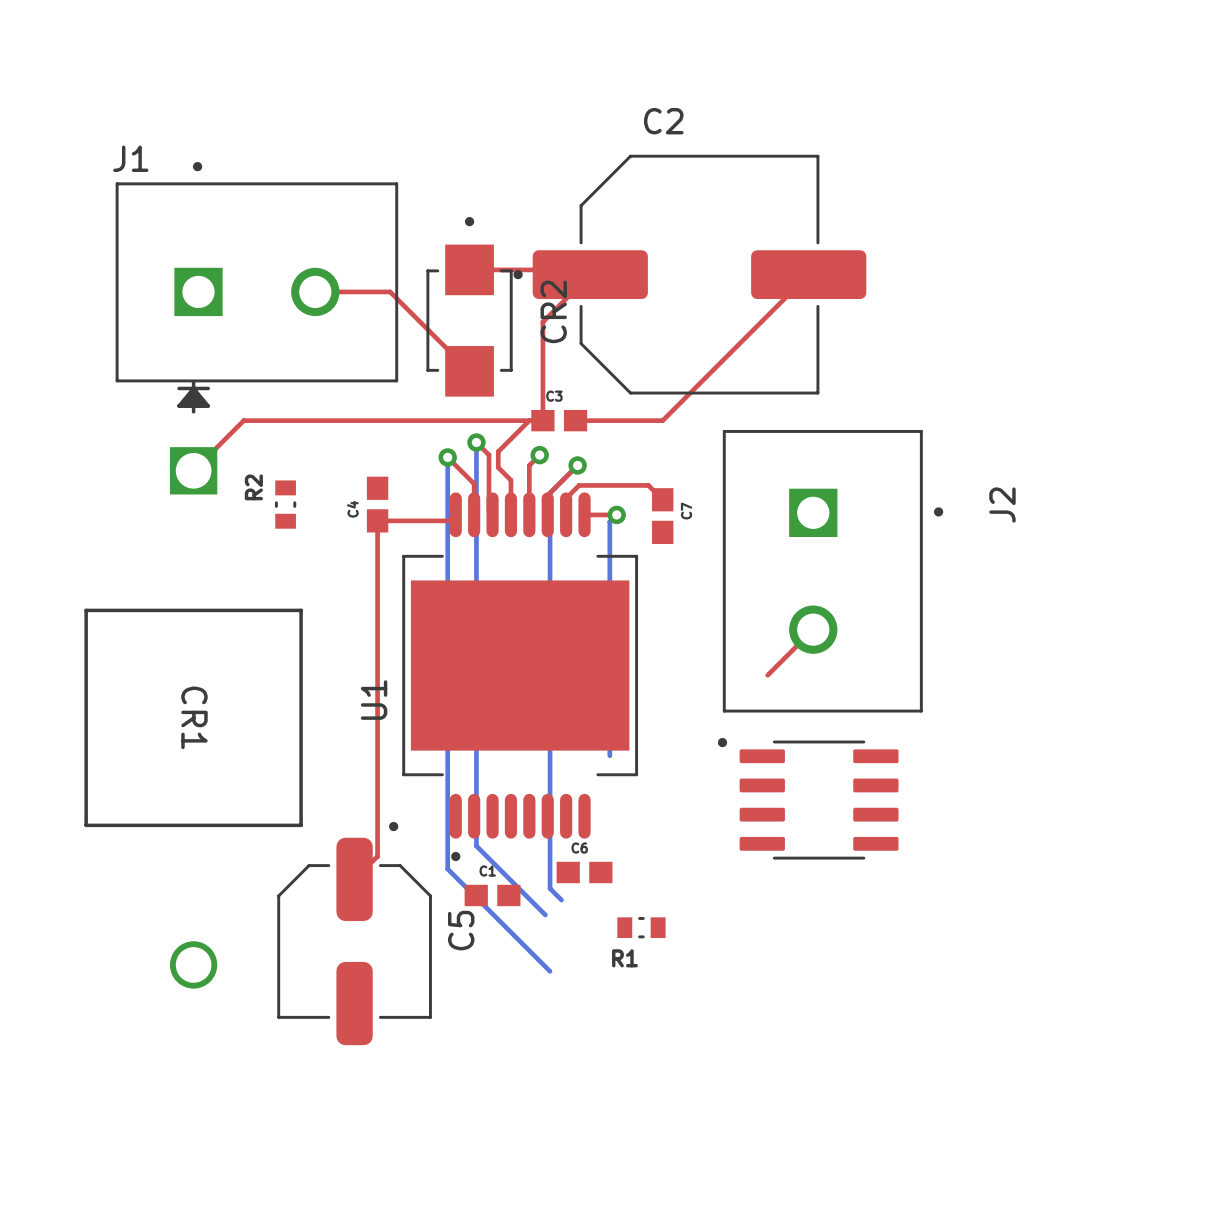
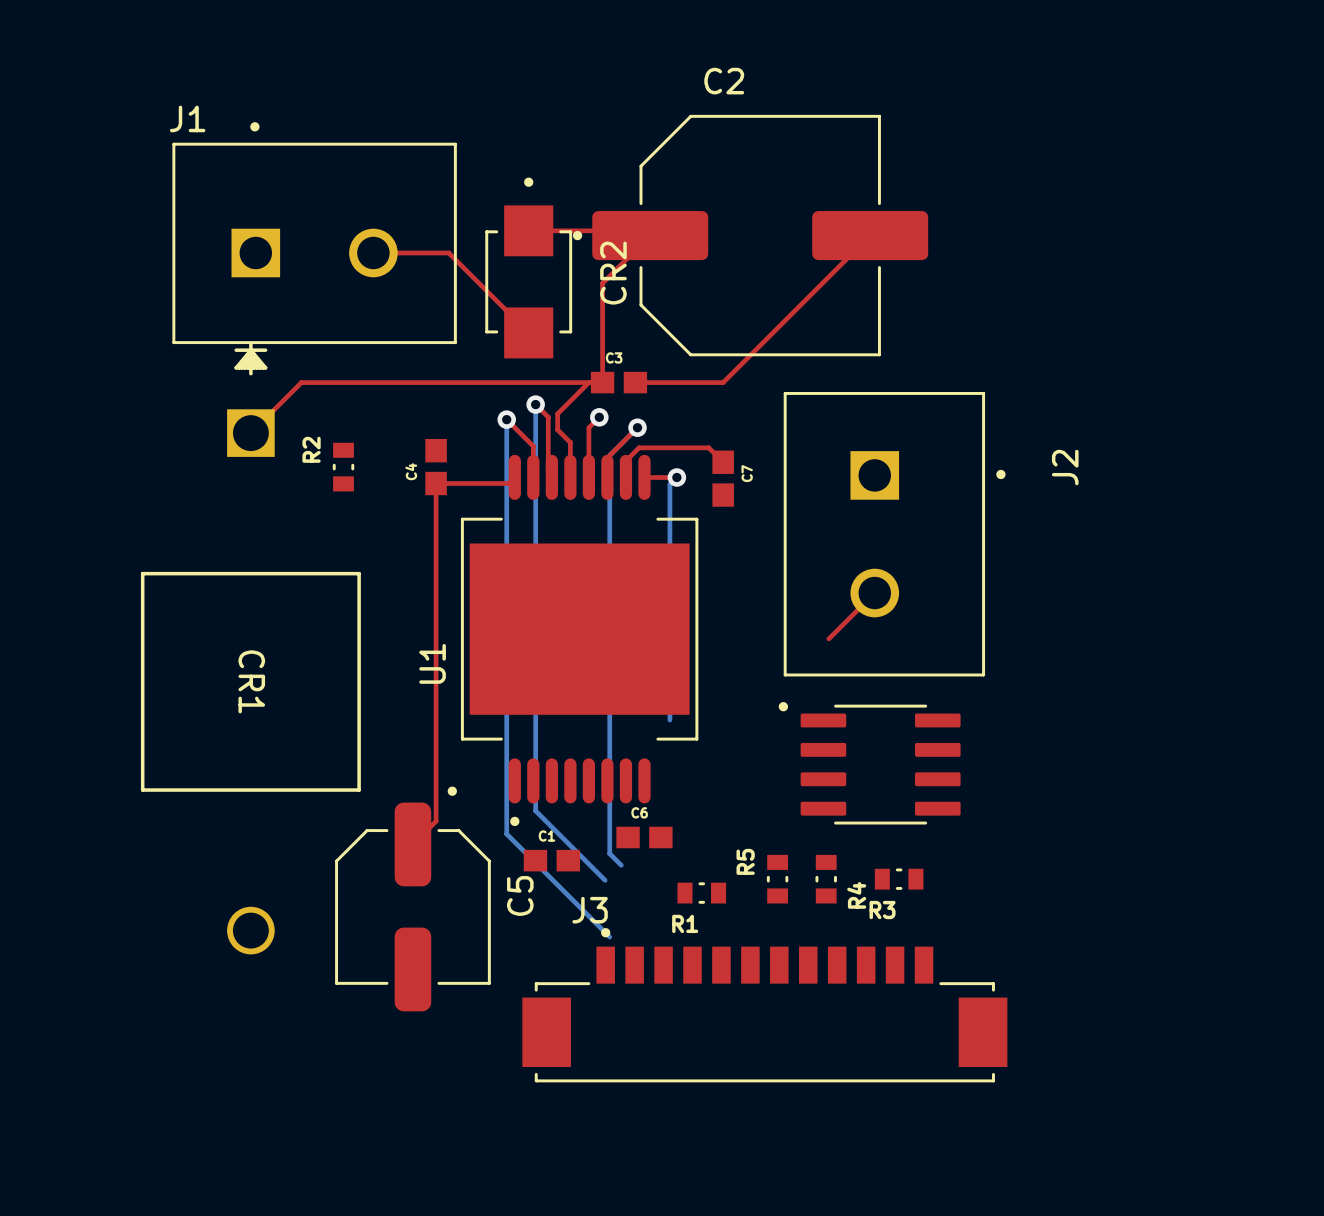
R5: none -> (777, 879)
R4: none -> (826, 879)
R3: none -> (899, 879)
J3: none -> (764, 1005)

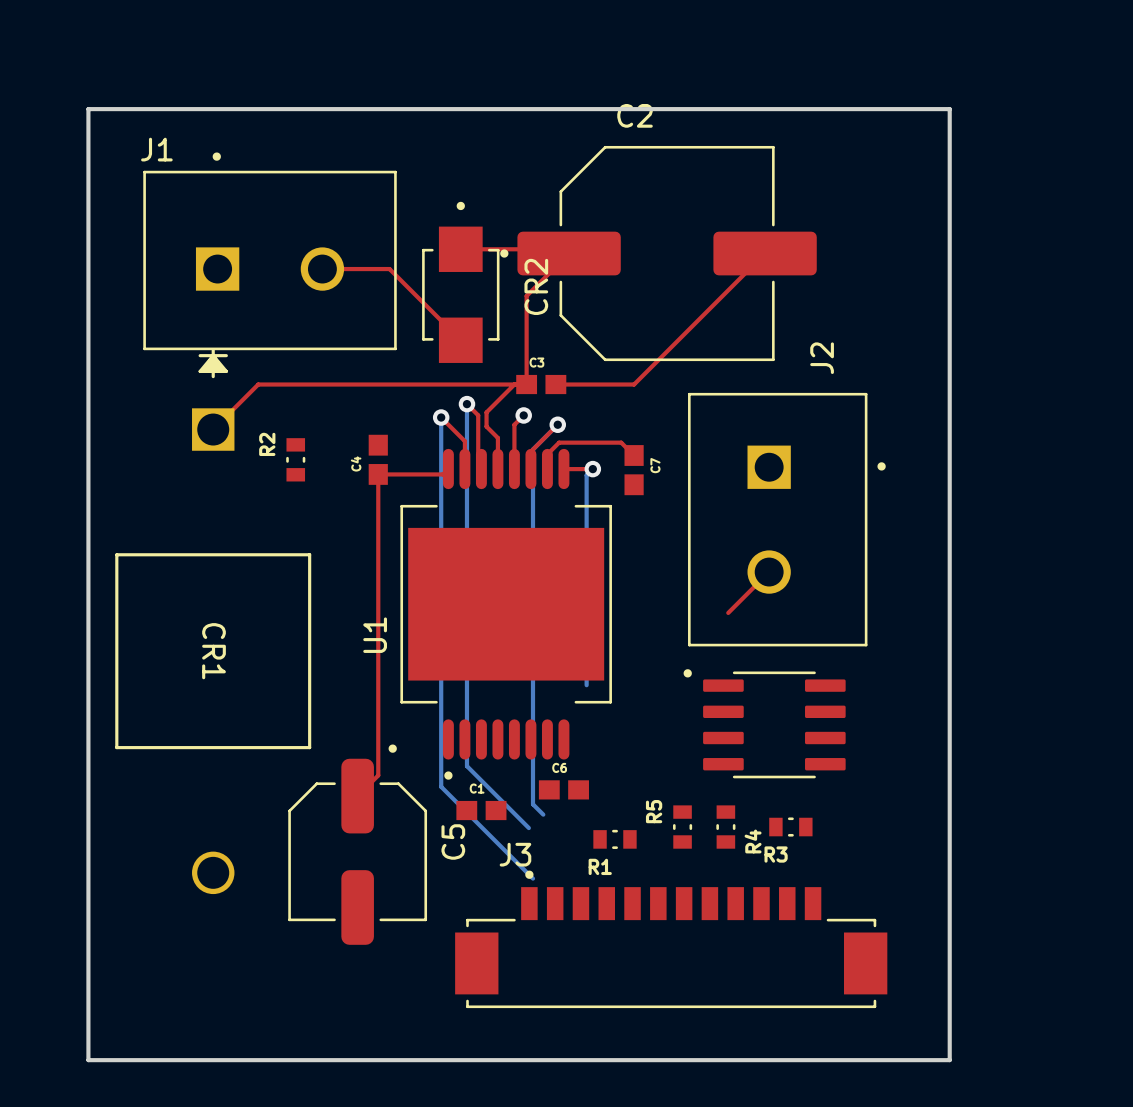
board edge: none -> (88, 109) (949, 109) (949, 1060) (88, 1060) (88, 109)
J2 name position: J2 (1065, 467) -> J2 (822, 358)

